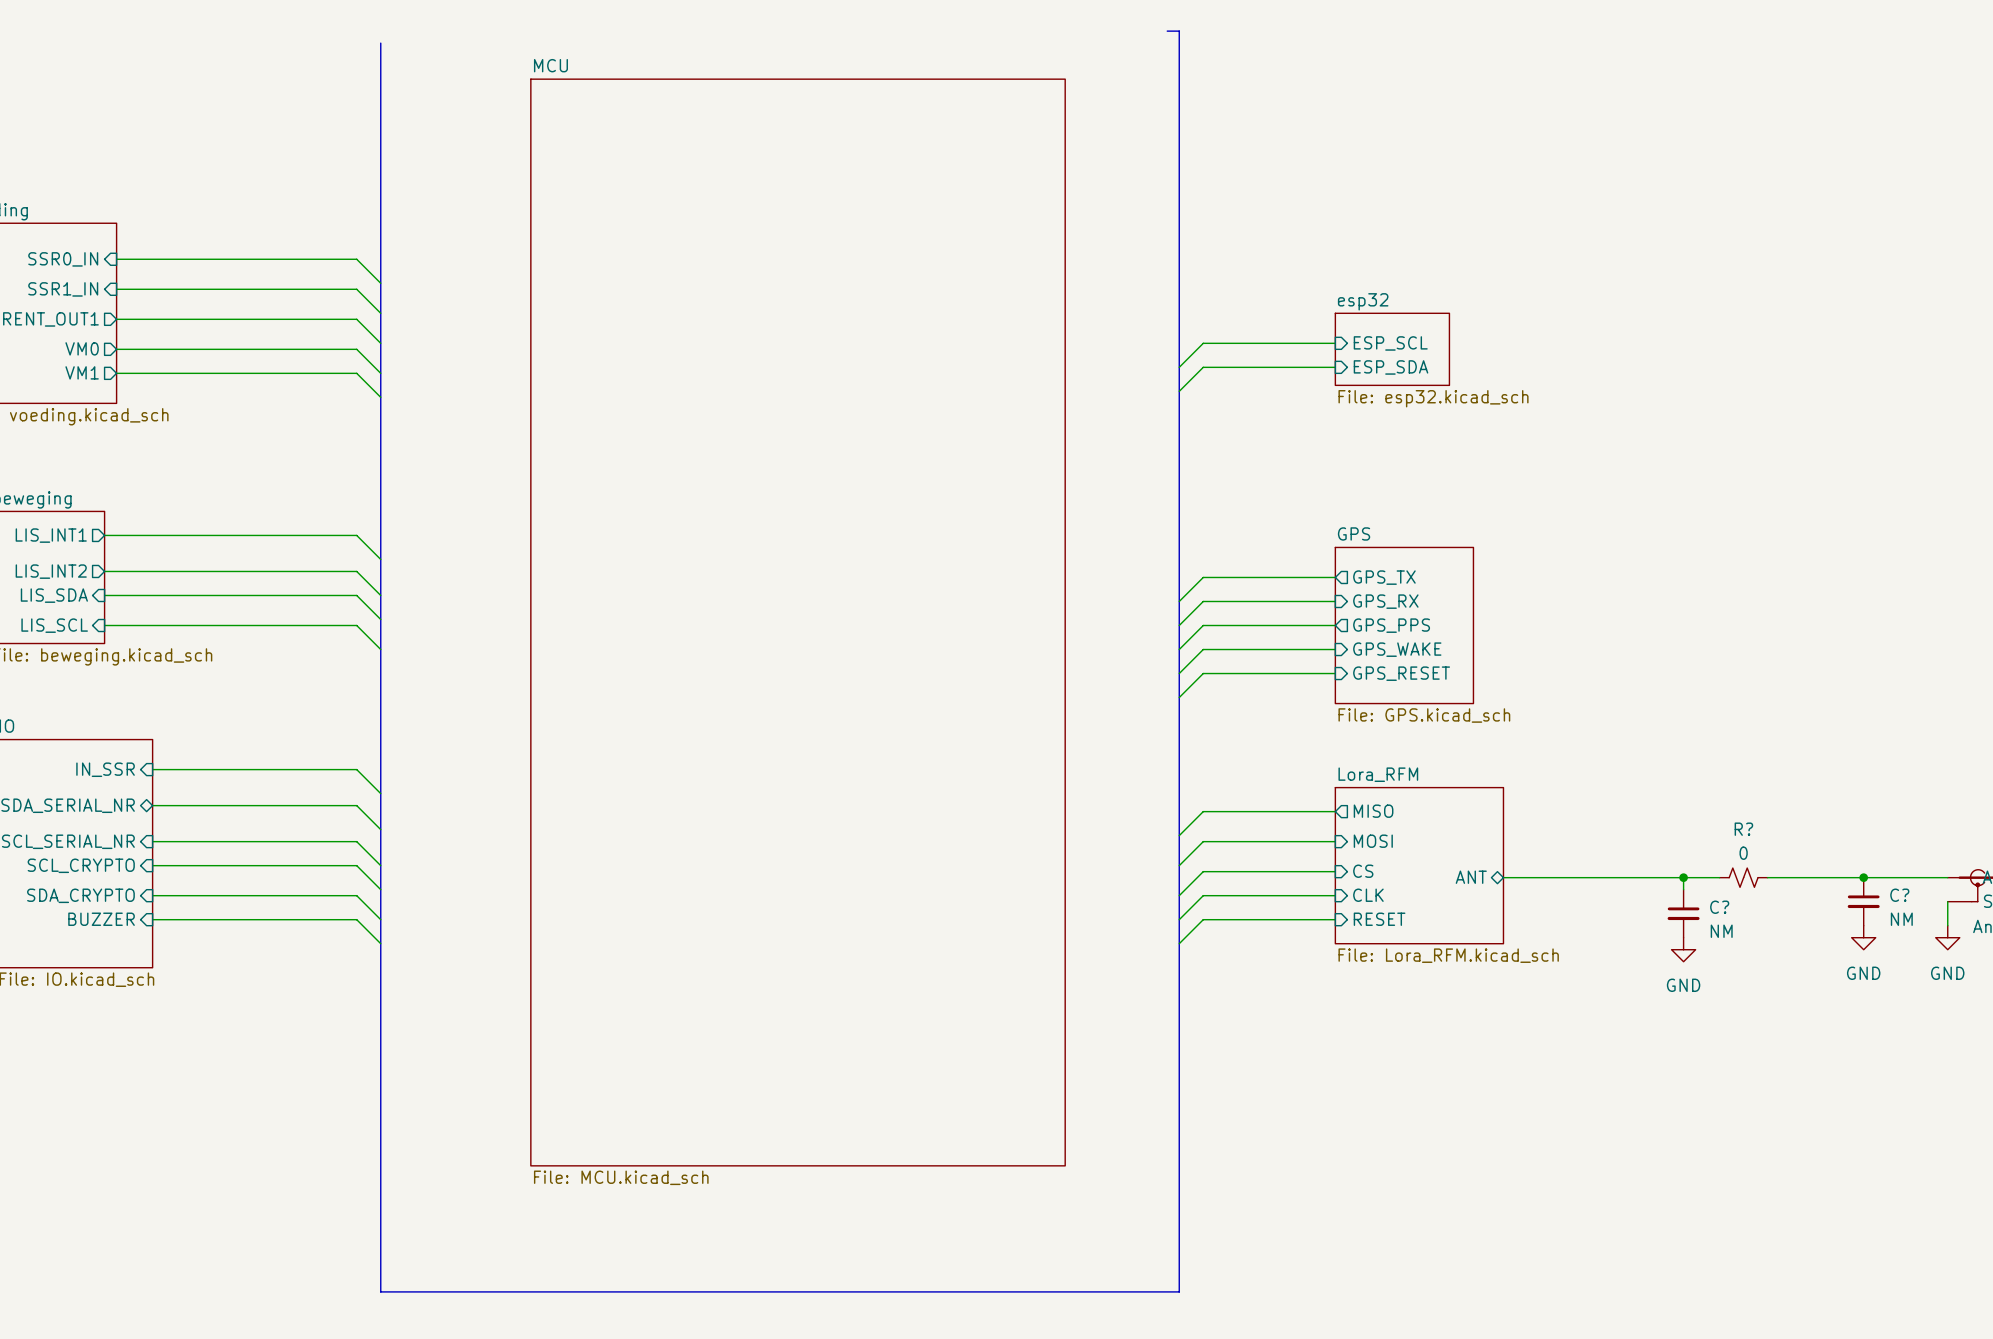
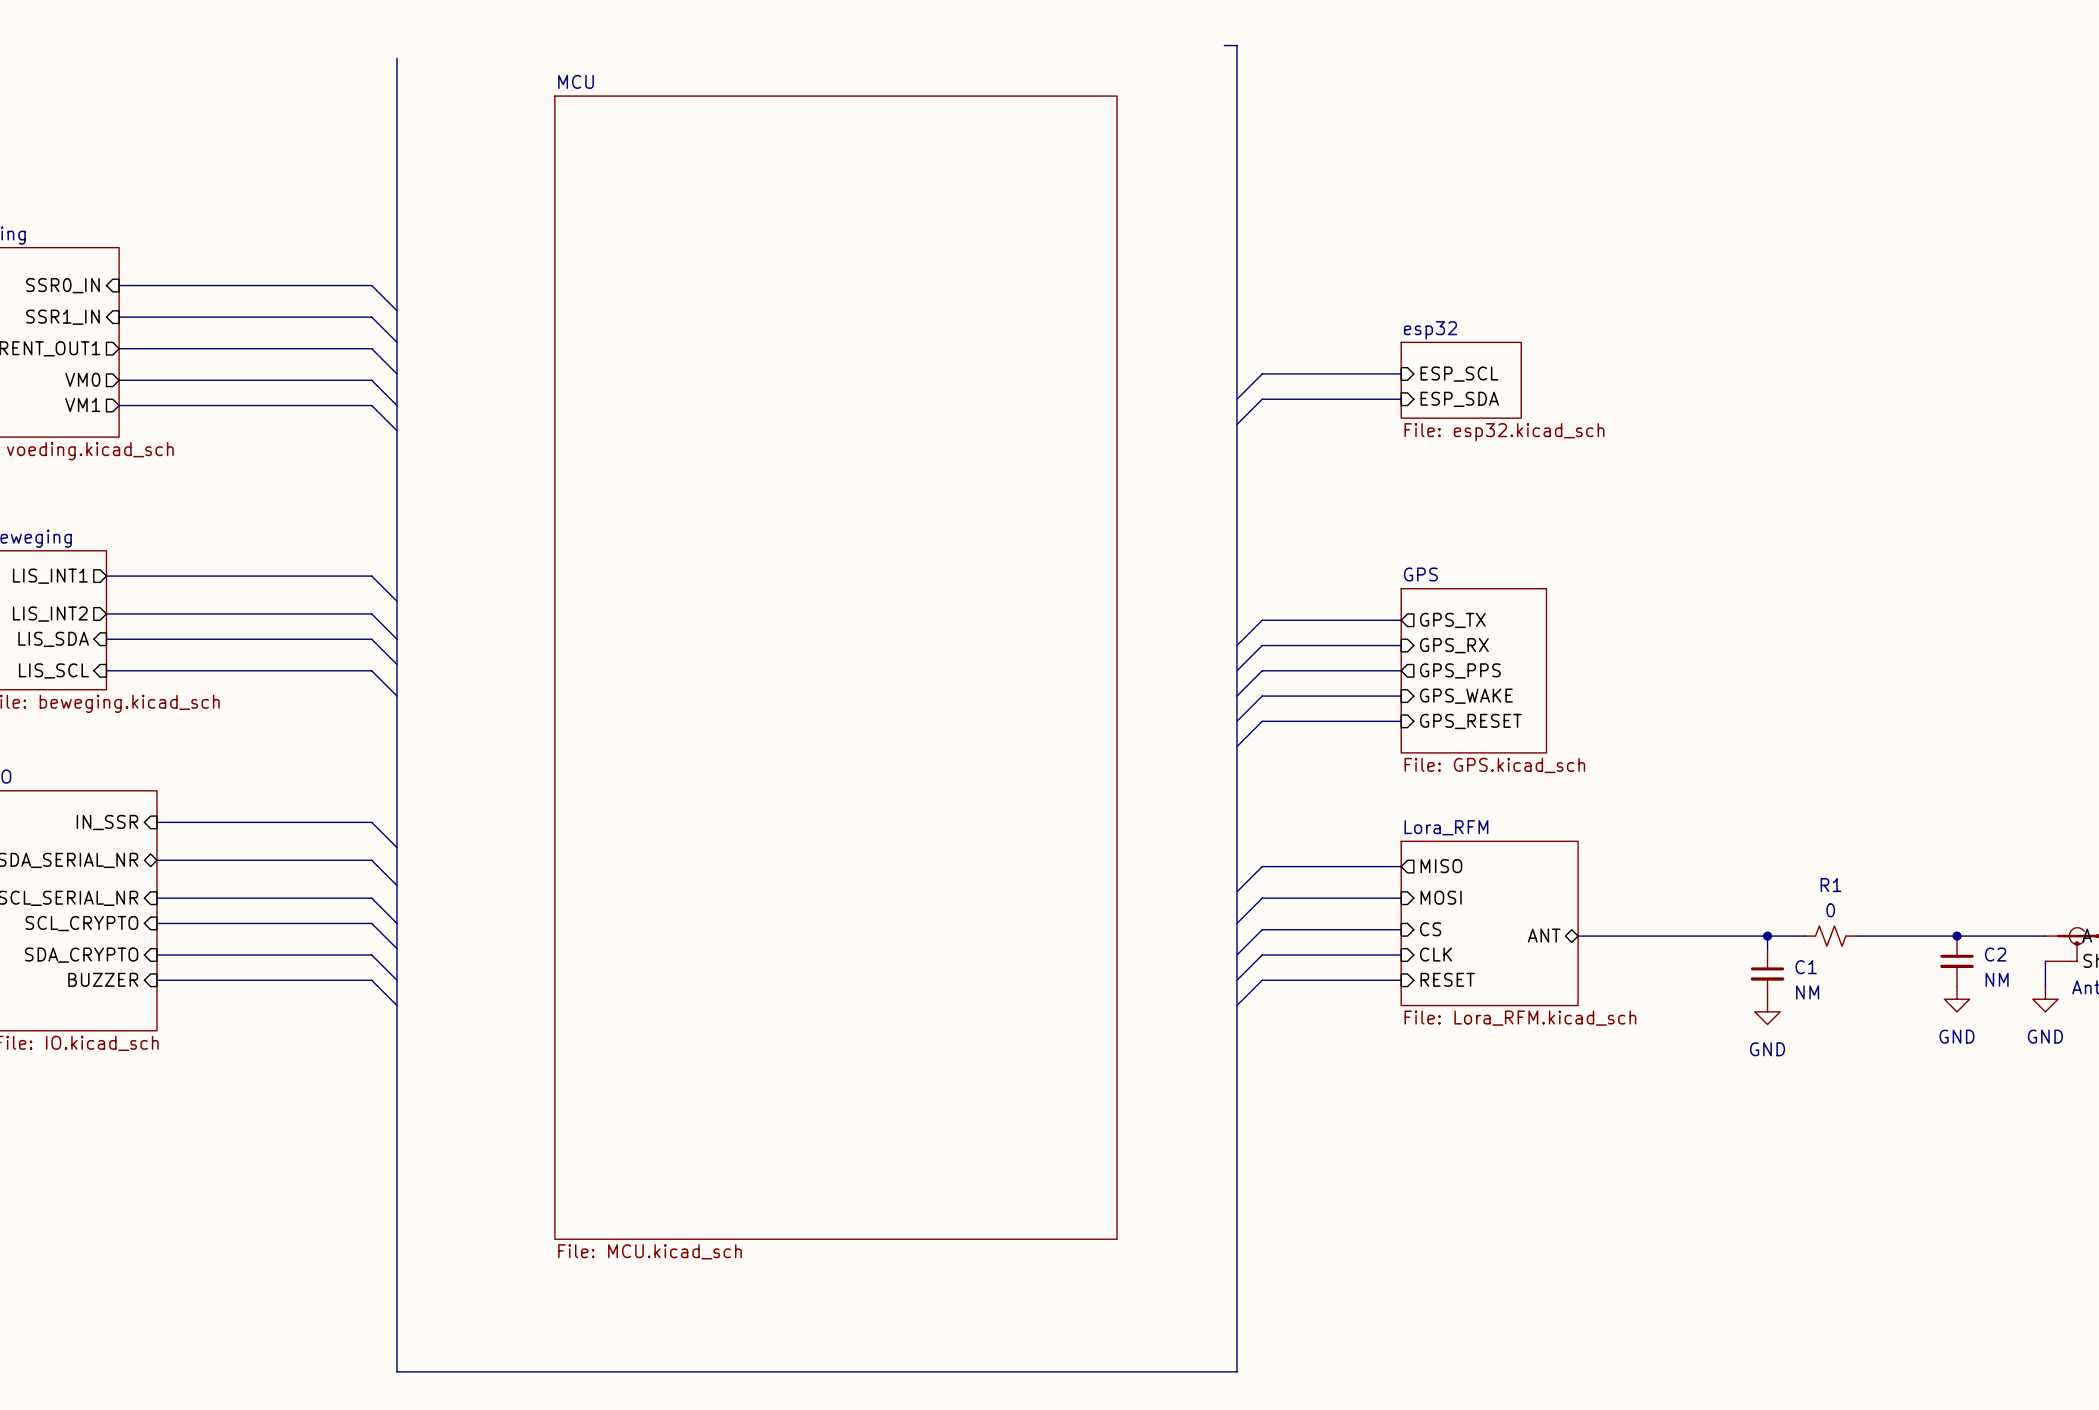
R? name: R? (1743, 829) -> R1 (1830, 885)
C? name: C? (1899, 895) -> C2 (1995, 954)
C? name: C? (1719, 907) -> C1 (1806, 967)

